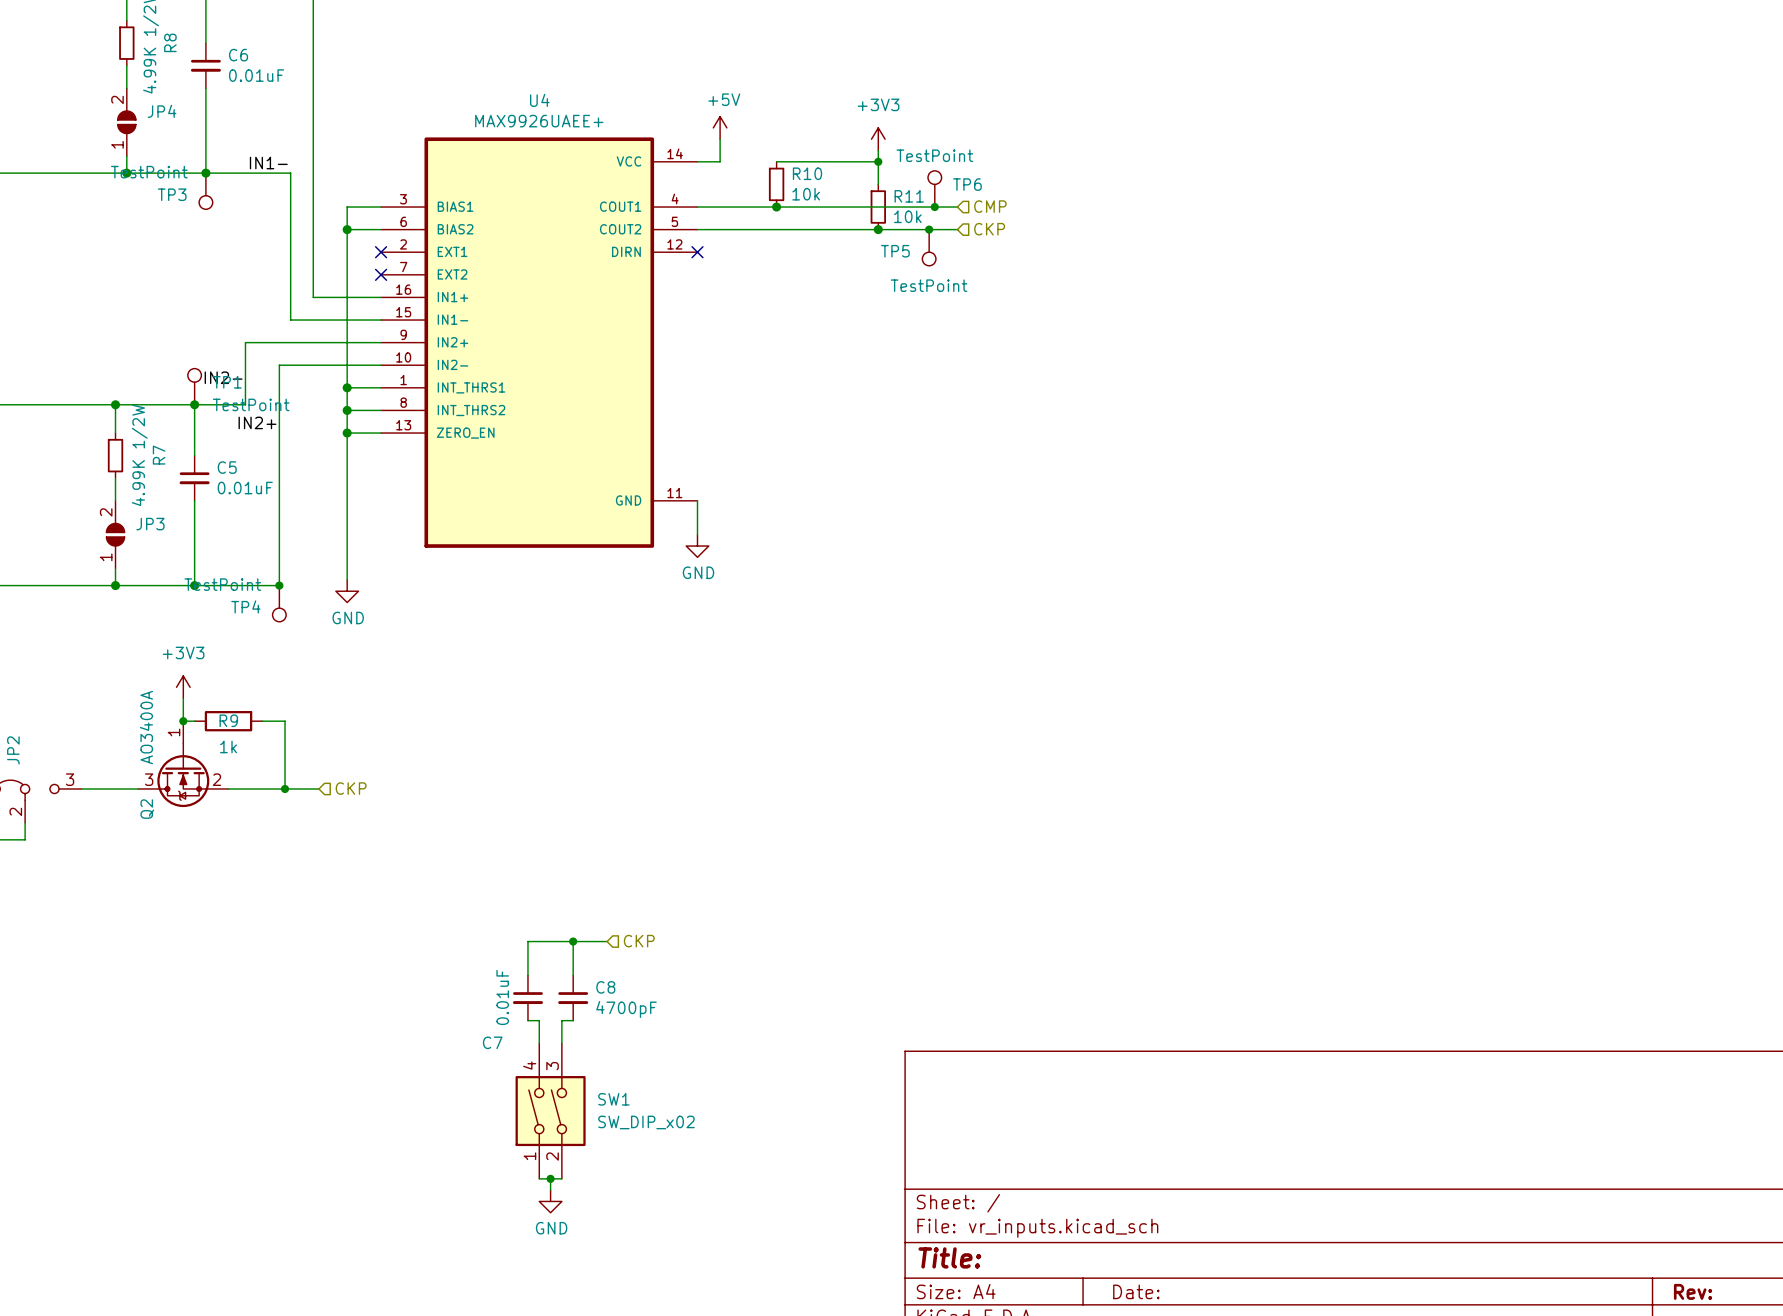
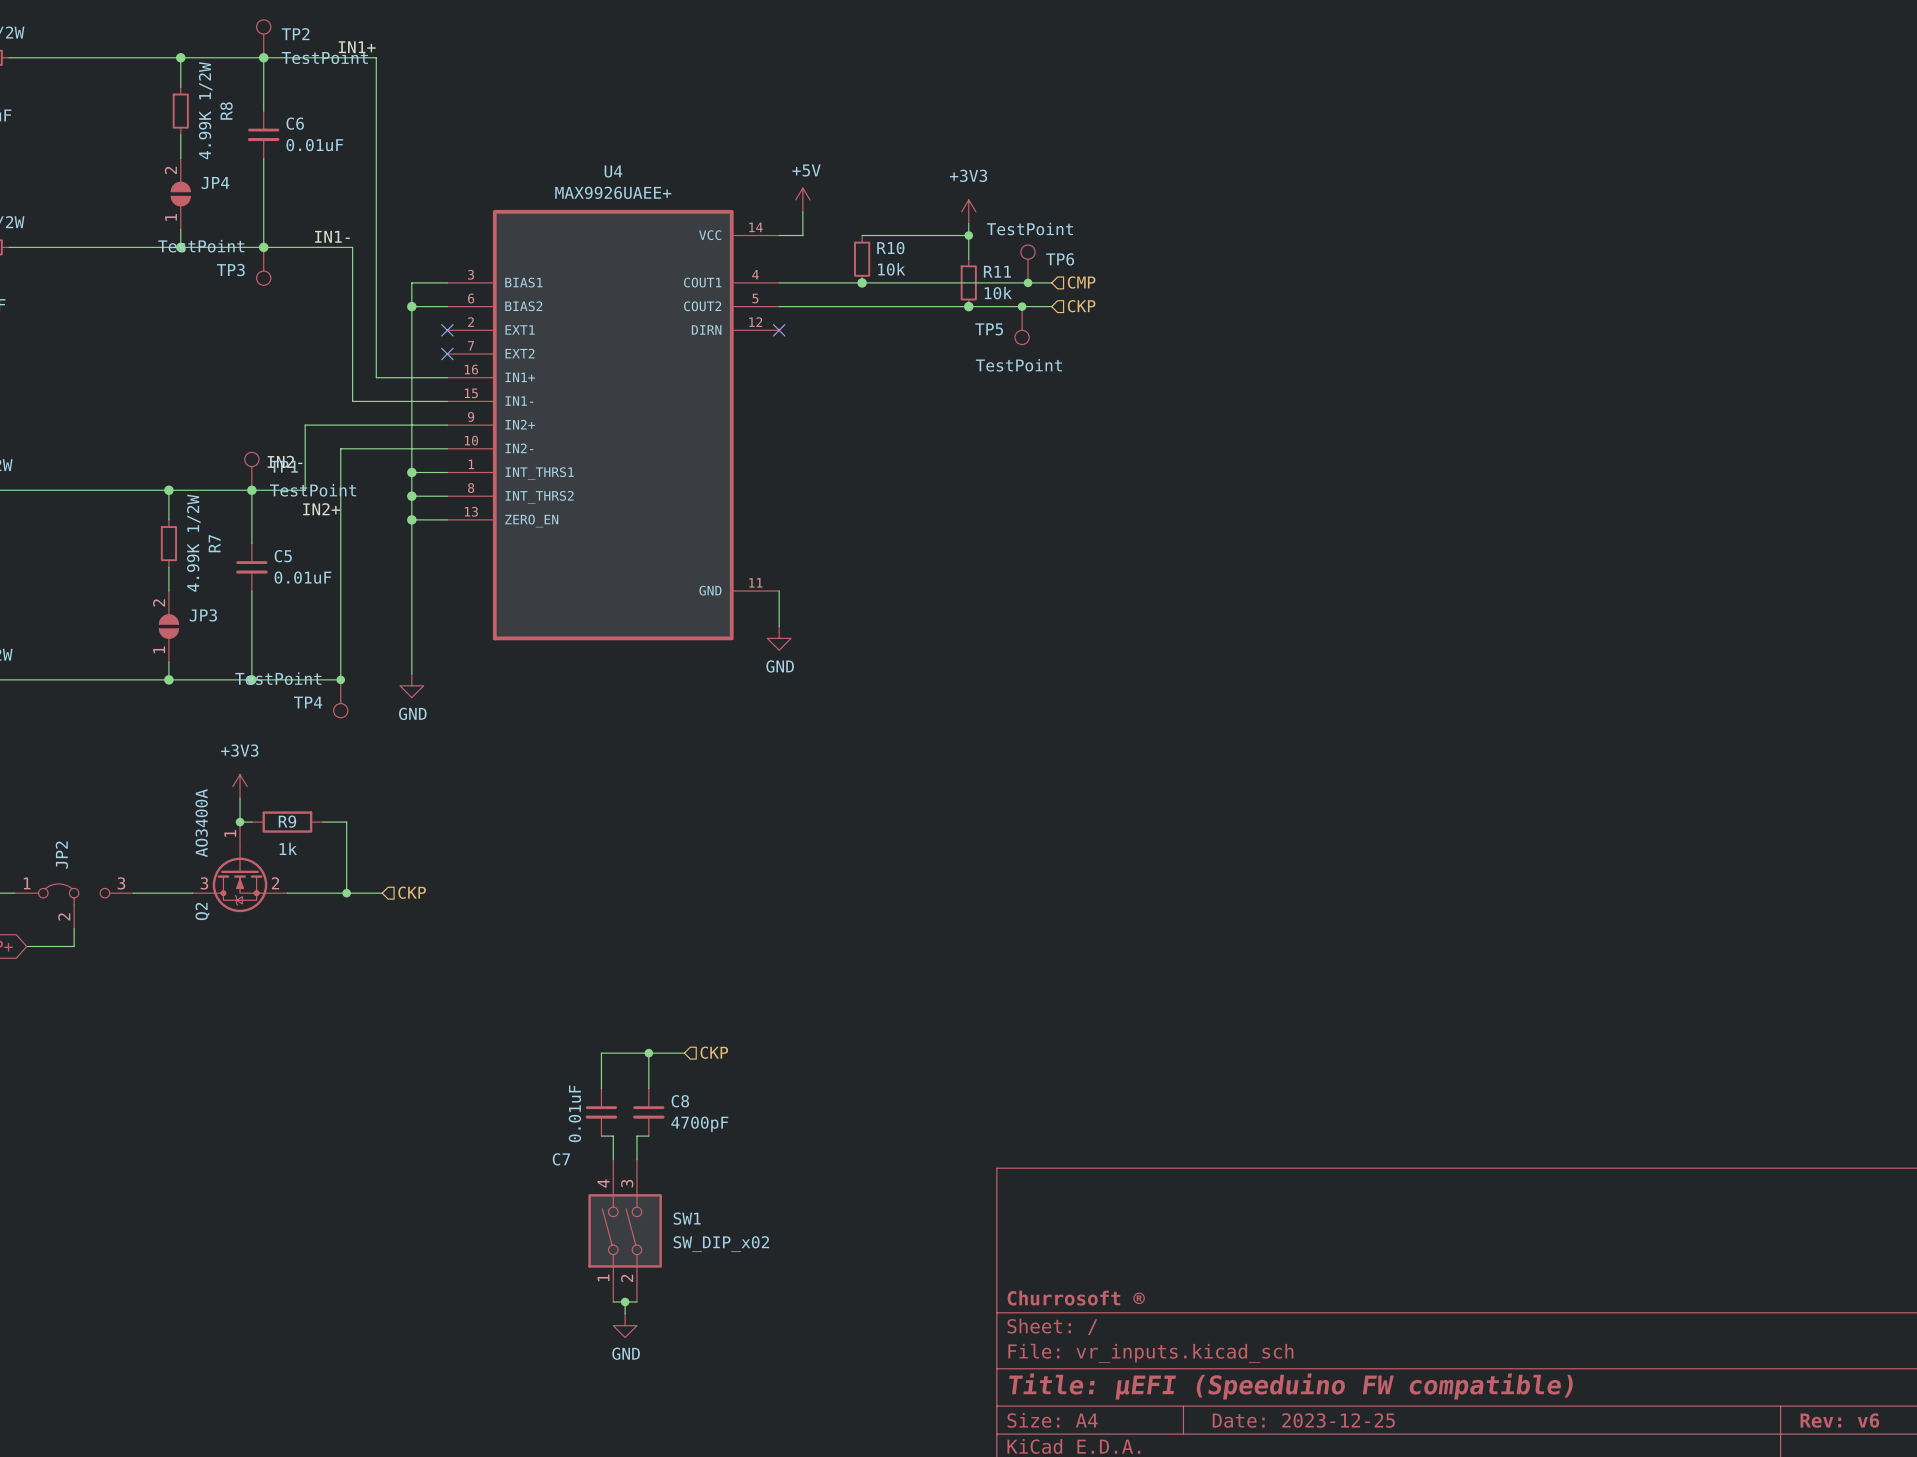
title block: none -> Churrosoft ® (1076, 1298)
title block: Title: (949, 1257) -> Title: μEFI (Speeduino FW compatible) (1291, 1386)
title block: Date: (1136, 1291) -> Date: 2023-12-25 (1303, 1420)
title block: Rev: (1693, 1291) -> Rev: v6 (1839, 1420)

